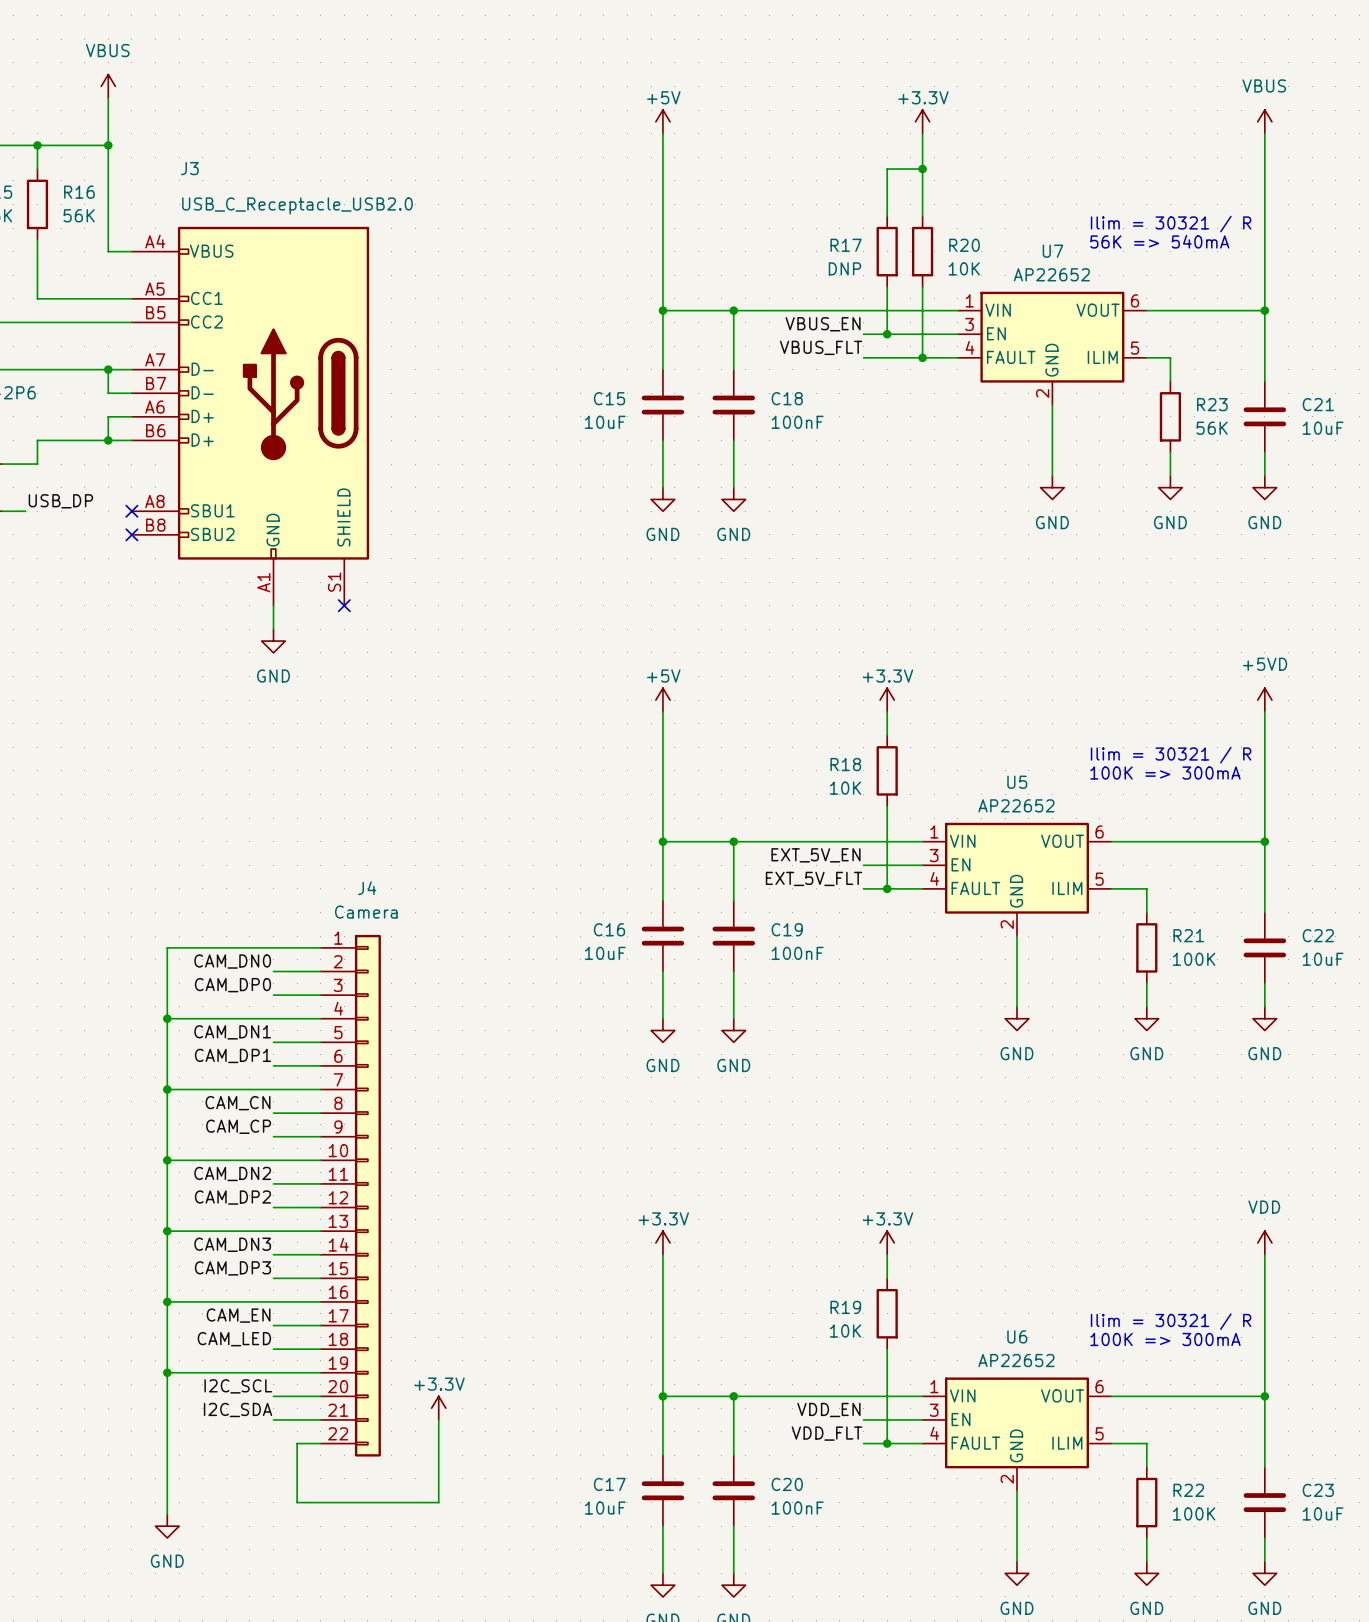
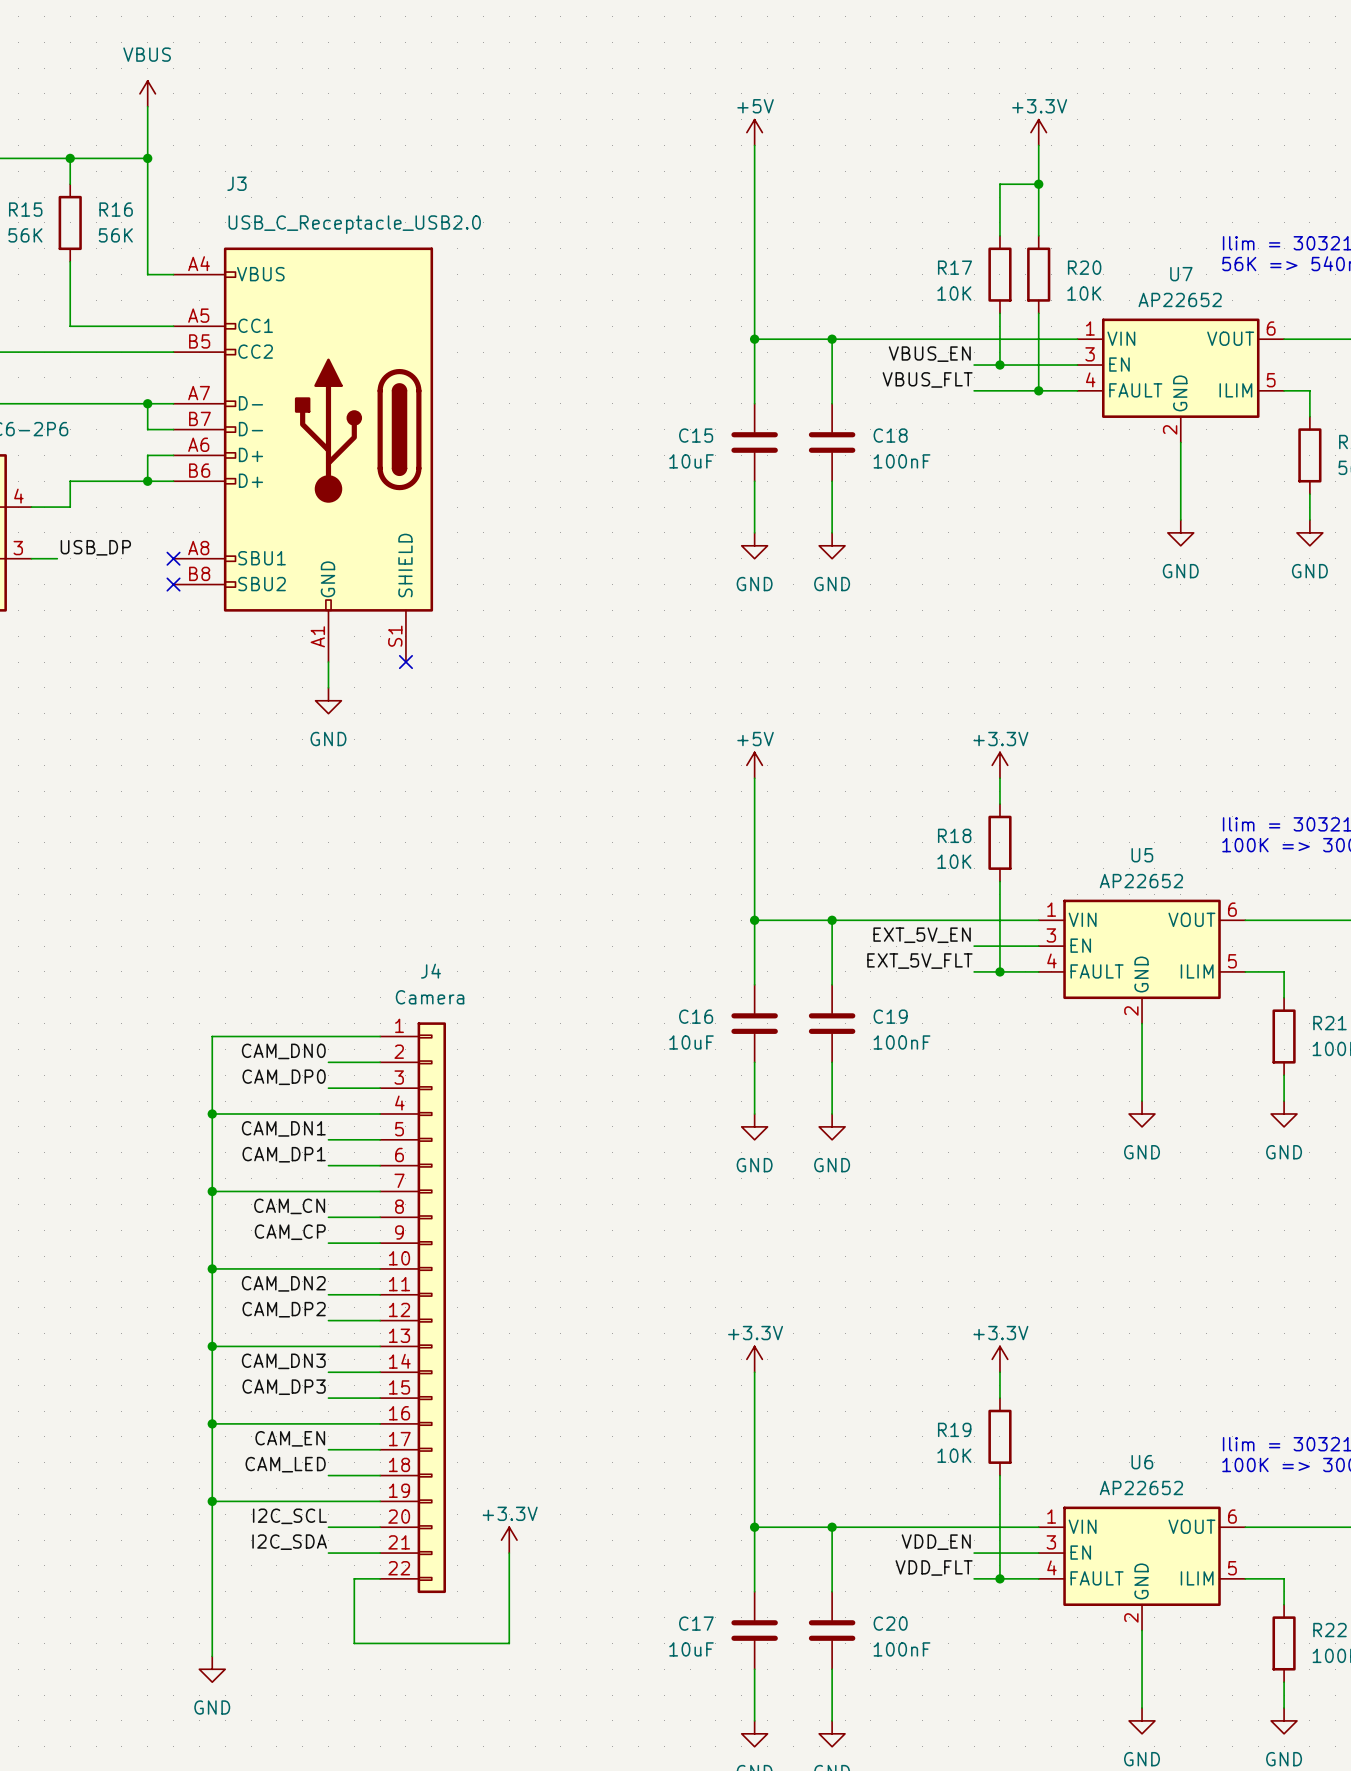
R17 value: DNP (844, 268) -> 10K (954, 293)

